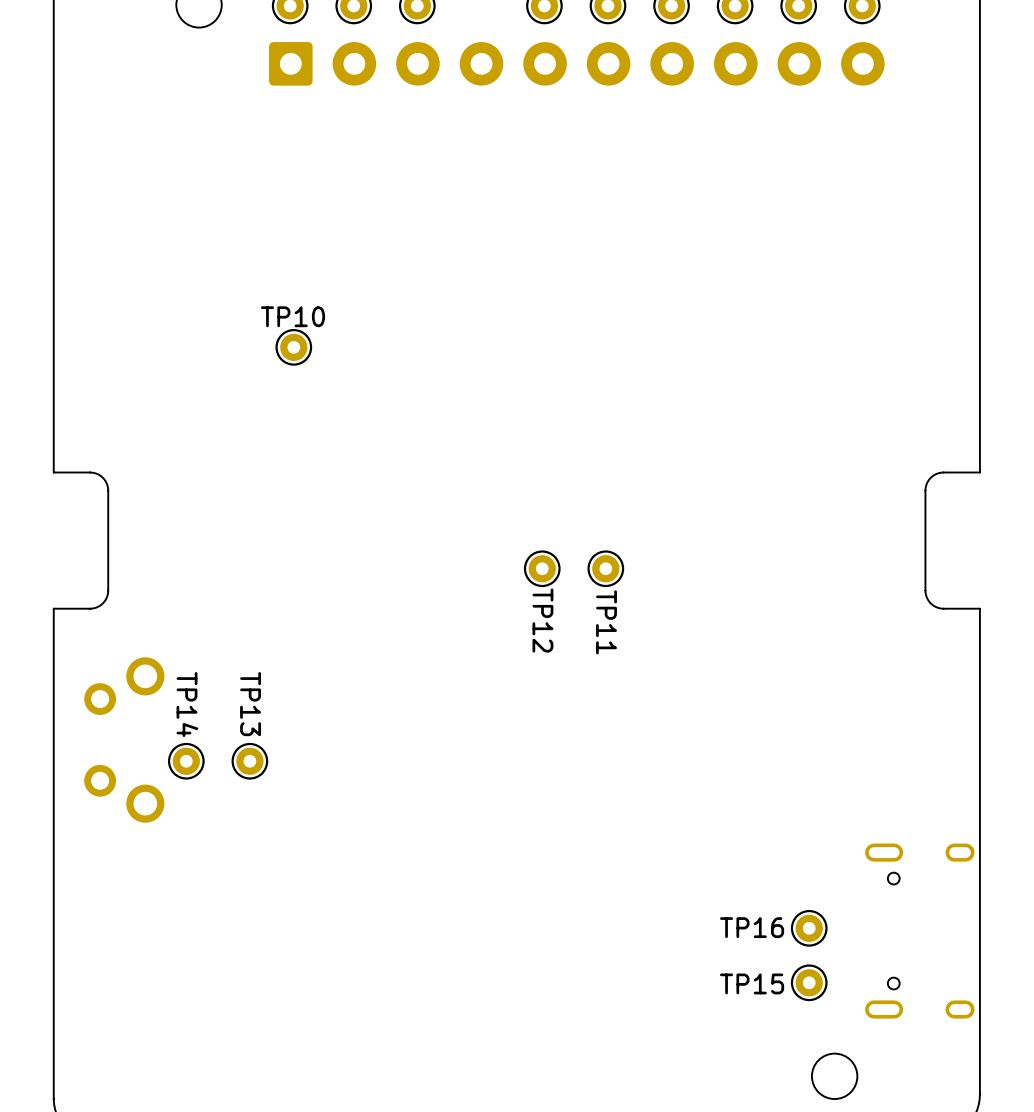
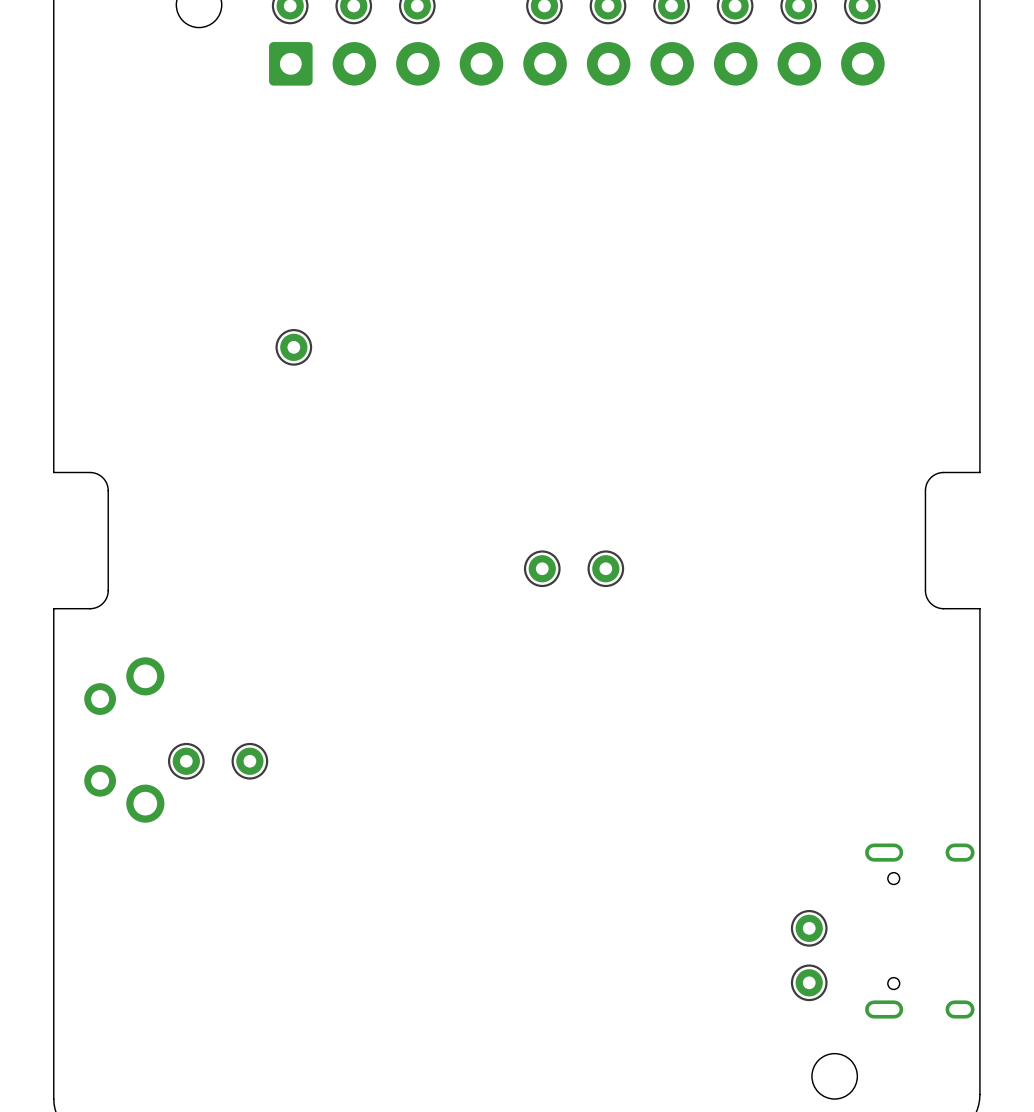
TP10 name: TP10 (292, 316) -> none
TP12 name: TP12 (542, 620) -> none
TP11 name: TP11 (606, 622) -> none
TP14 name: TP14 (187, 704) -> none
TP13 name: TP13 (250, 704) -> none
TP16 name: TP16 (752, 927) -> none
TP15 name: TP15 (752, 983) -> none

